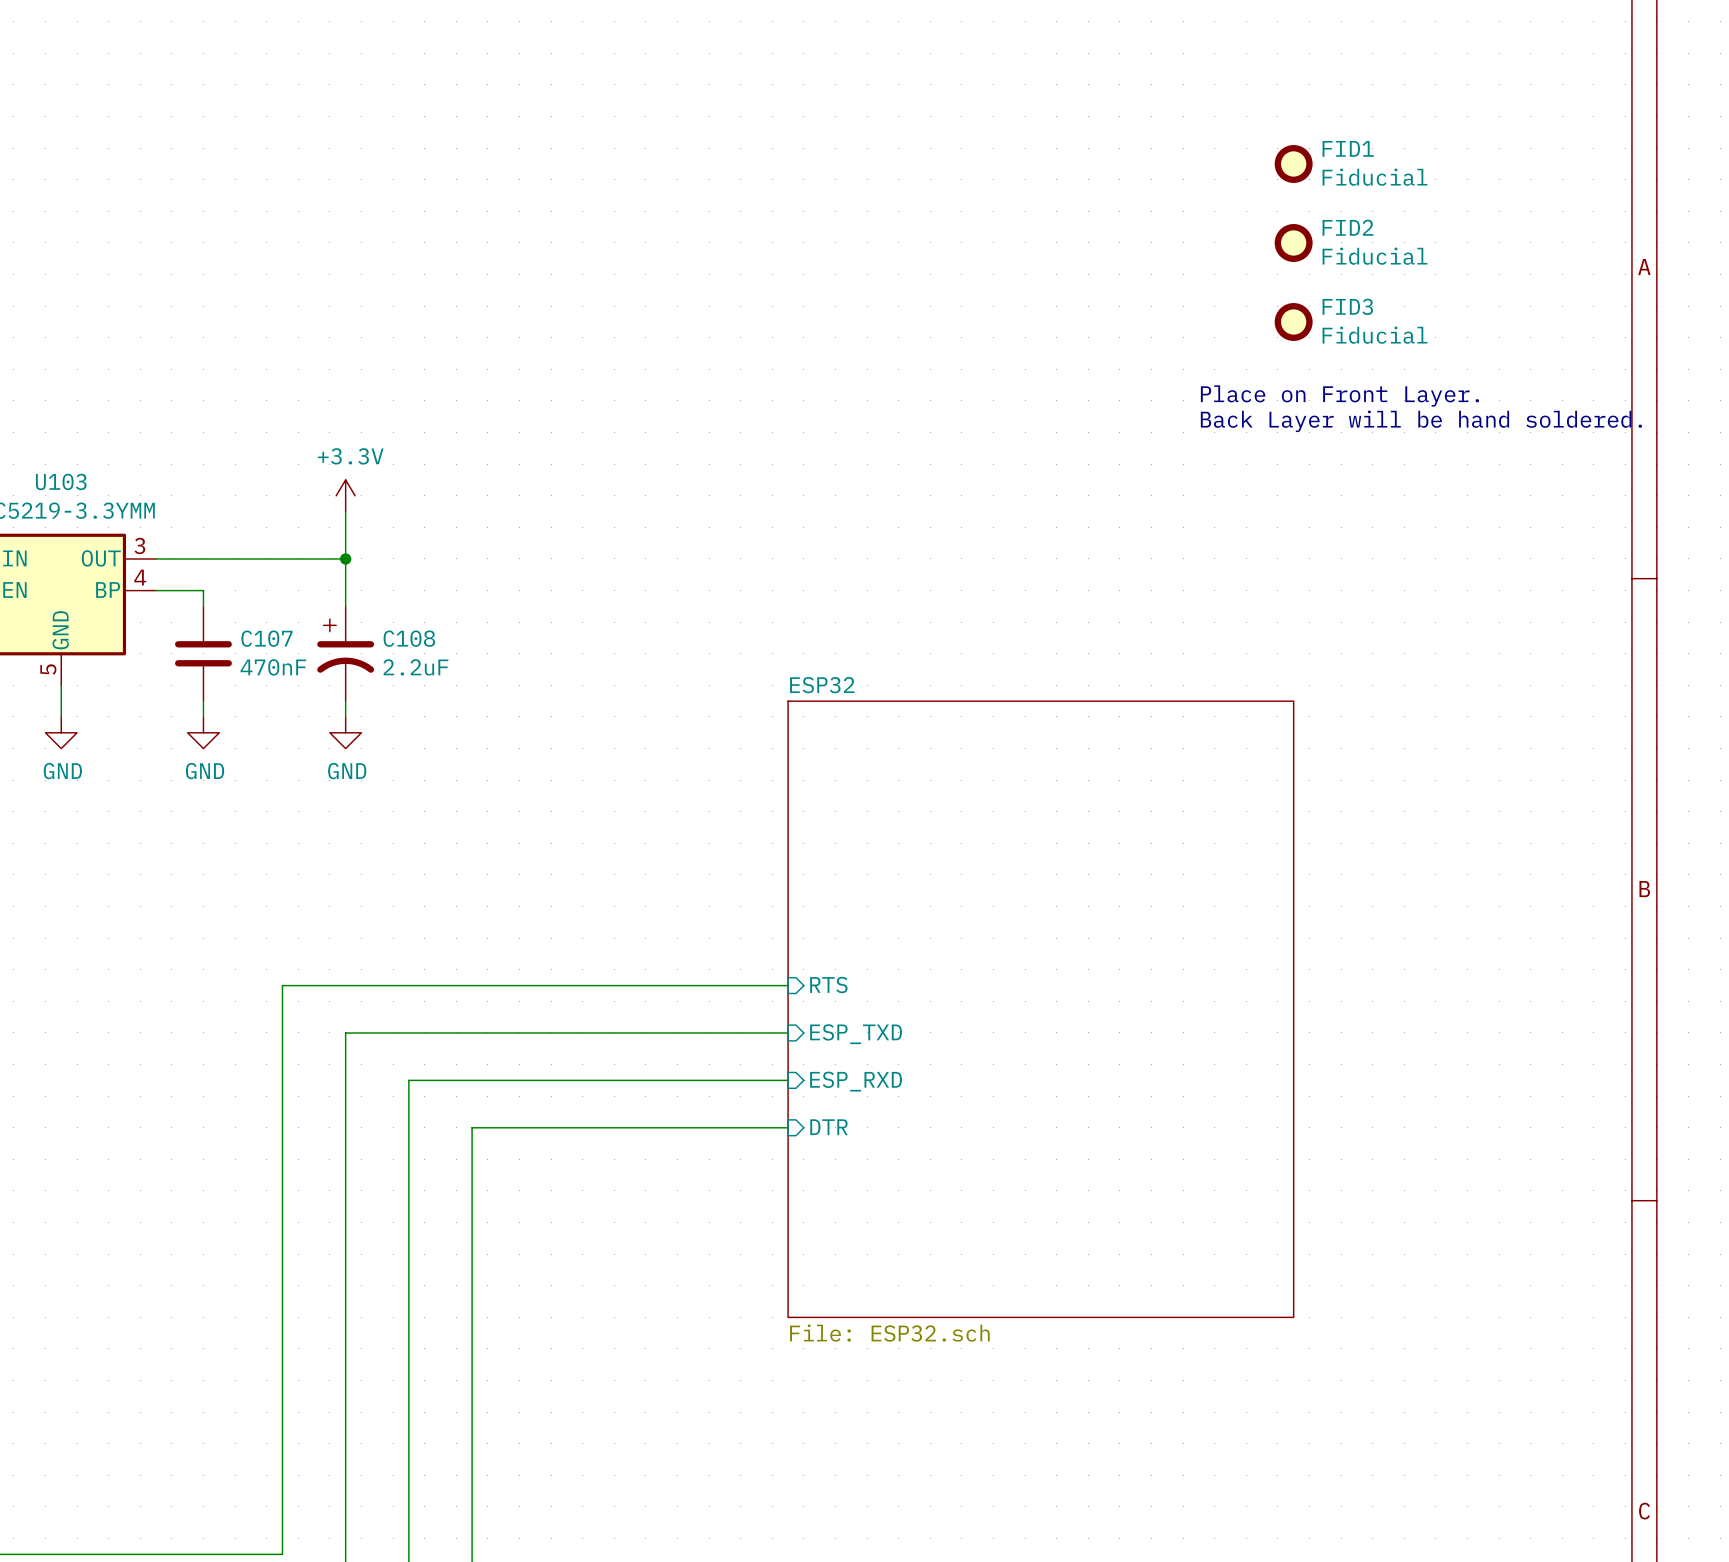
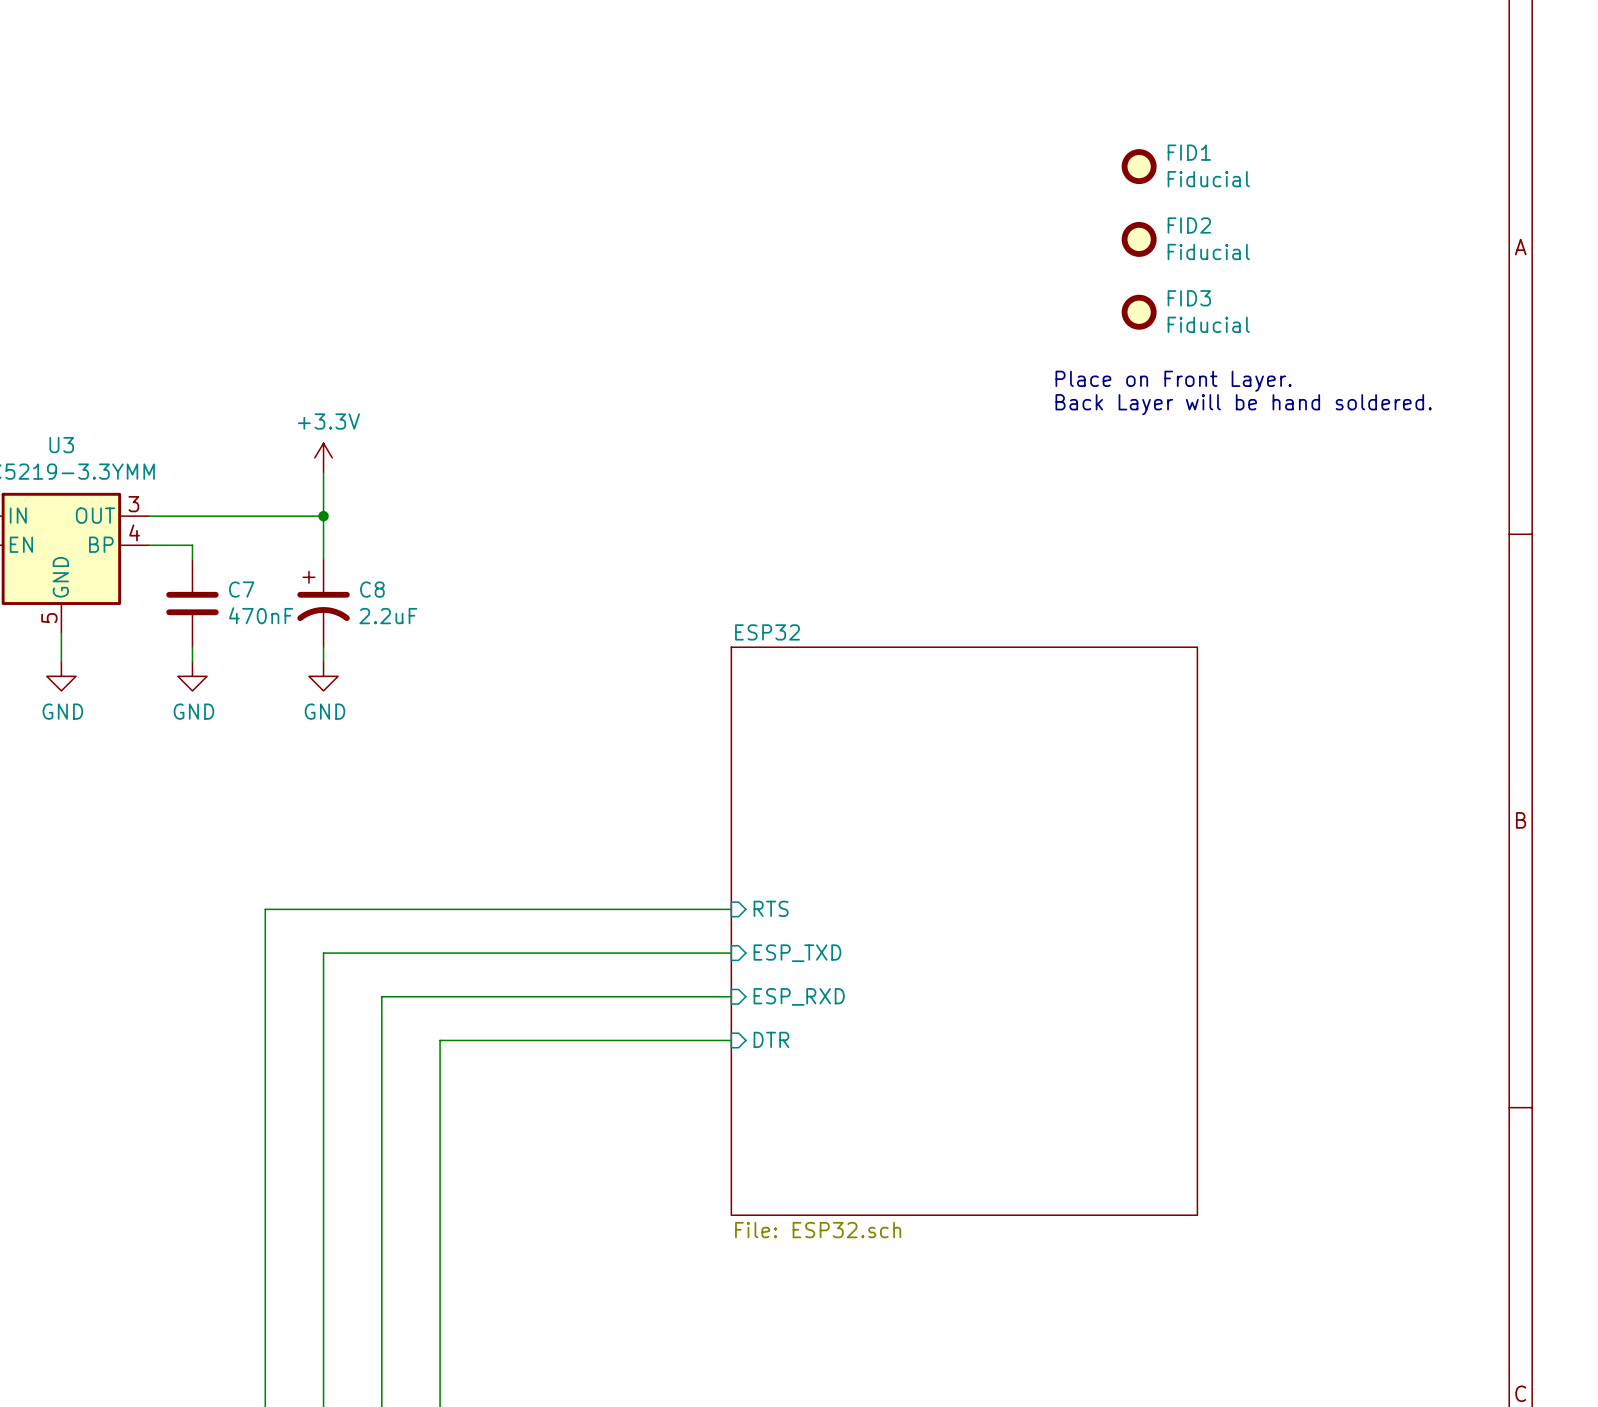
FID1 position: (1293, 163) -> (1139, 166)
FID2 position: (1293, 242) -> (1139, 239)
FID3 position: (1293, 321) -> (1139, 312)
text position: Place on Front Layer. (1339, 396) -> Place on Front Layer. (1173, 381)
text position: Back Layer will be hand soldered. (1421, 421) -> Back Layer will be hand soldered. (1243, 404)
U103 name: U103 (61, 481) -> U3 (61, 445)
C107 name: C107 (266, 638) -> C7 (241, 589)
C108 name: C108 (409, 638) -> C8 (372, 589)

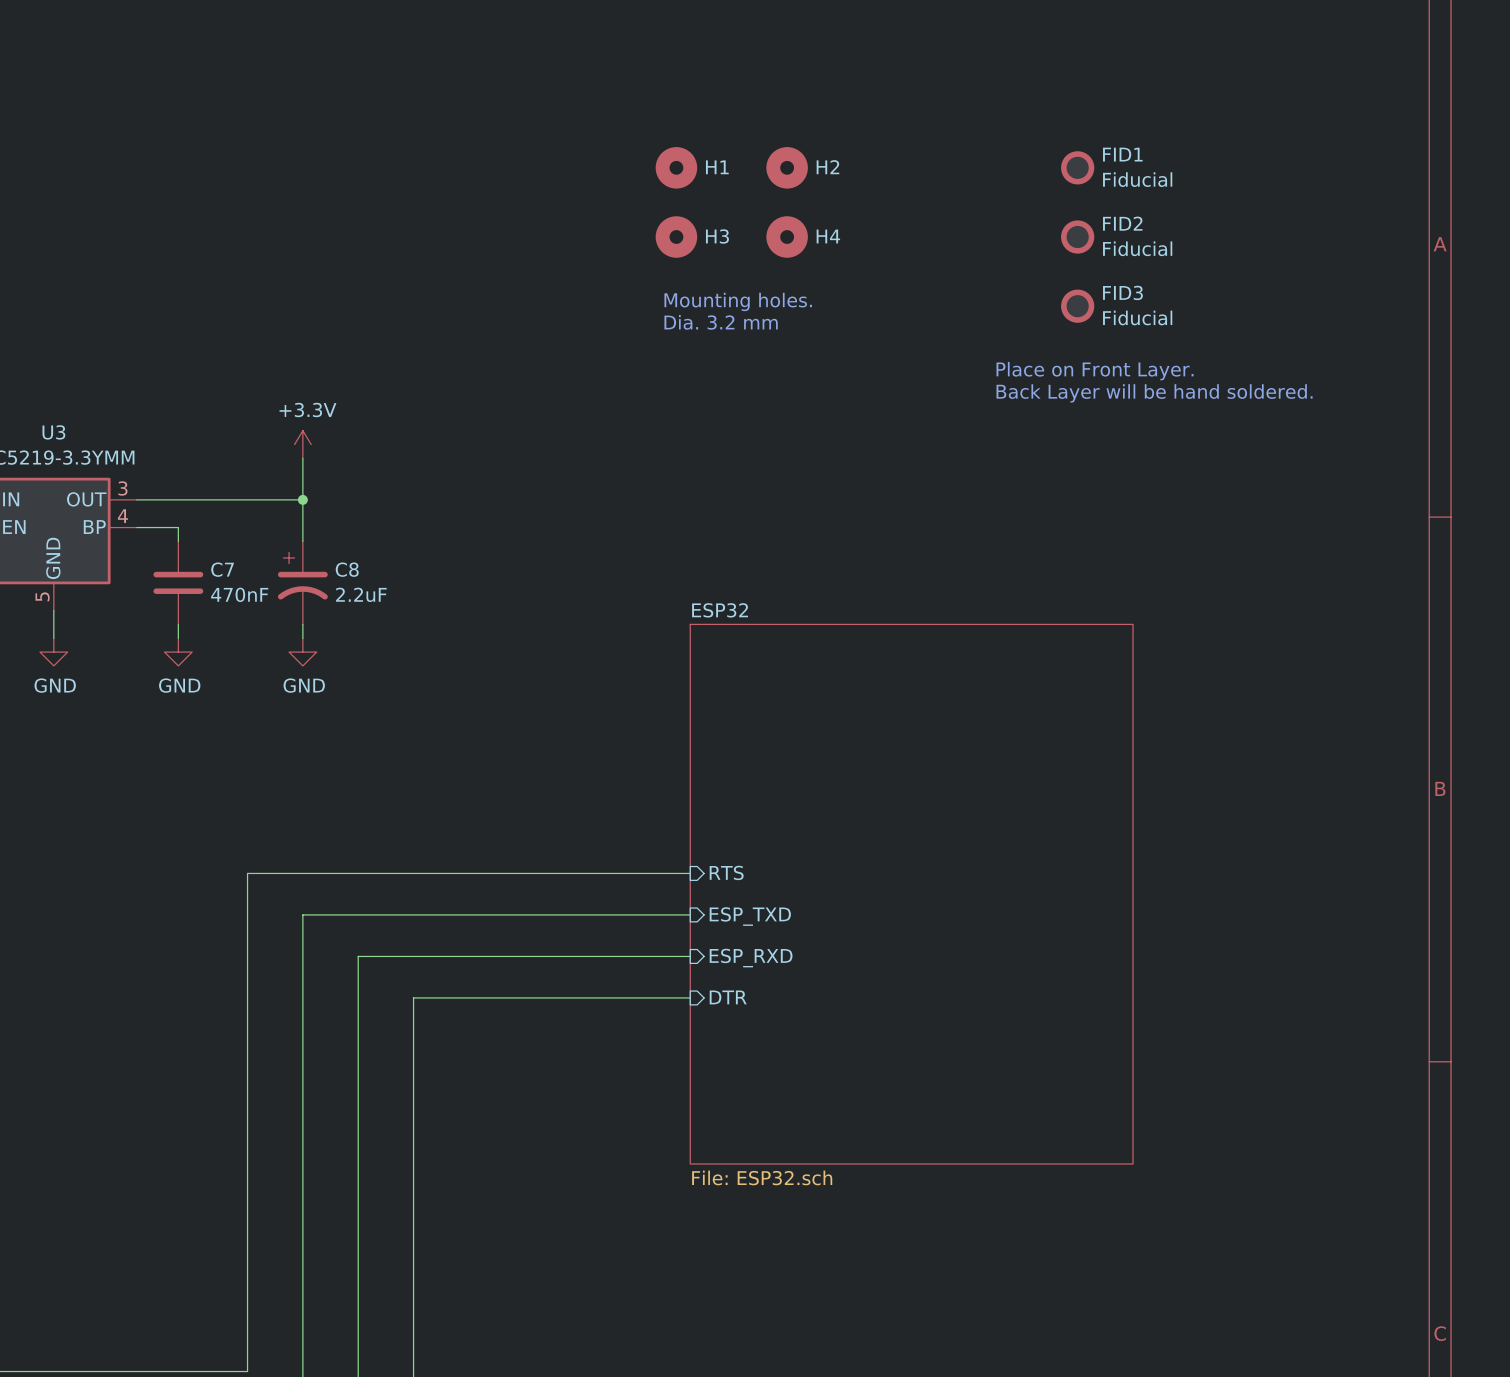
H1: none -> (676, 167)
H2: none -> (787, 167)
H3: none -> (676, 237)
H4: none -> (787, 237)
text: none -> Mounting holes. (738, 301)
text: none -> Dia. 3.2 mm (721, 322)

